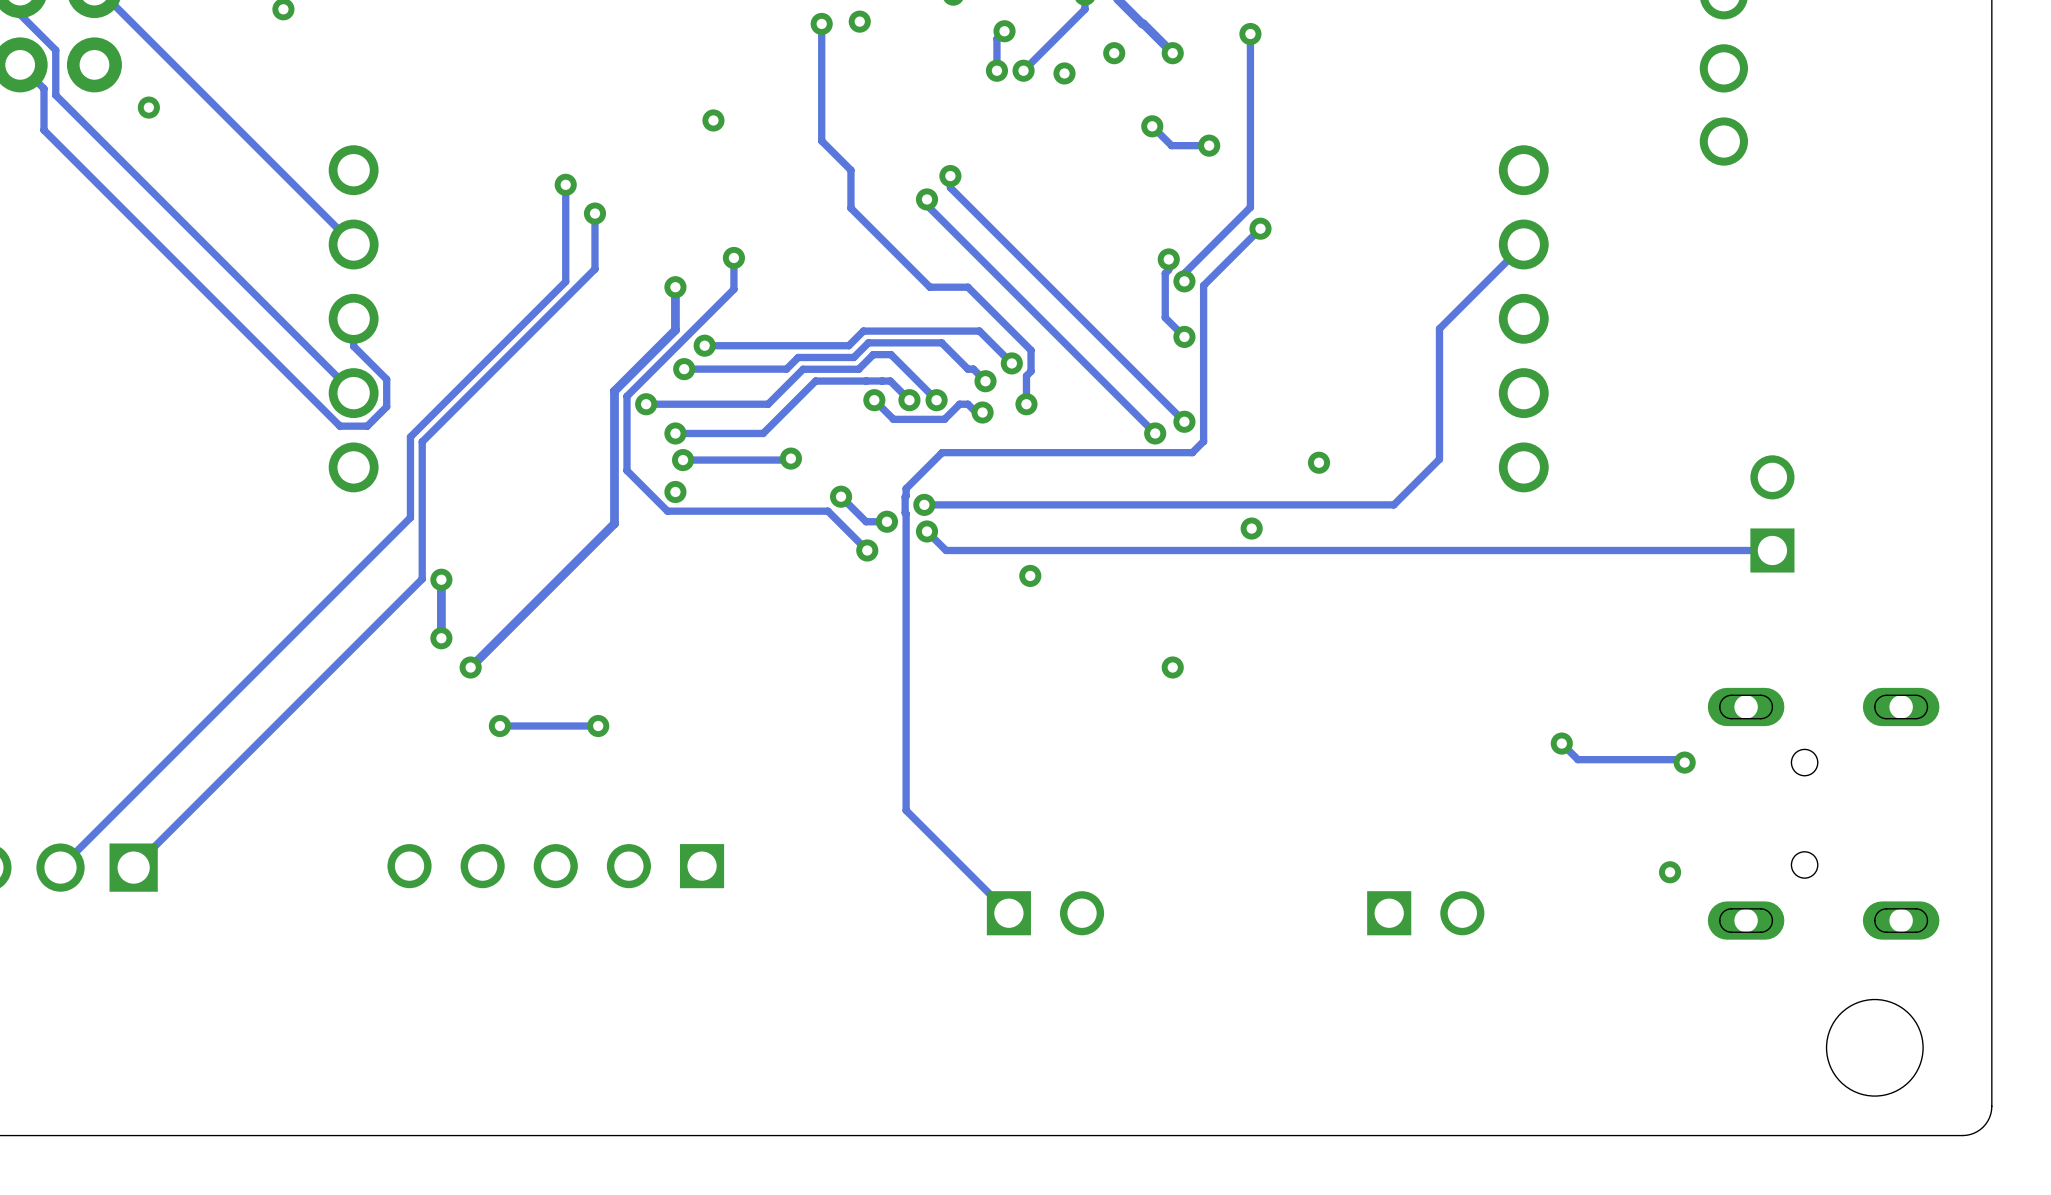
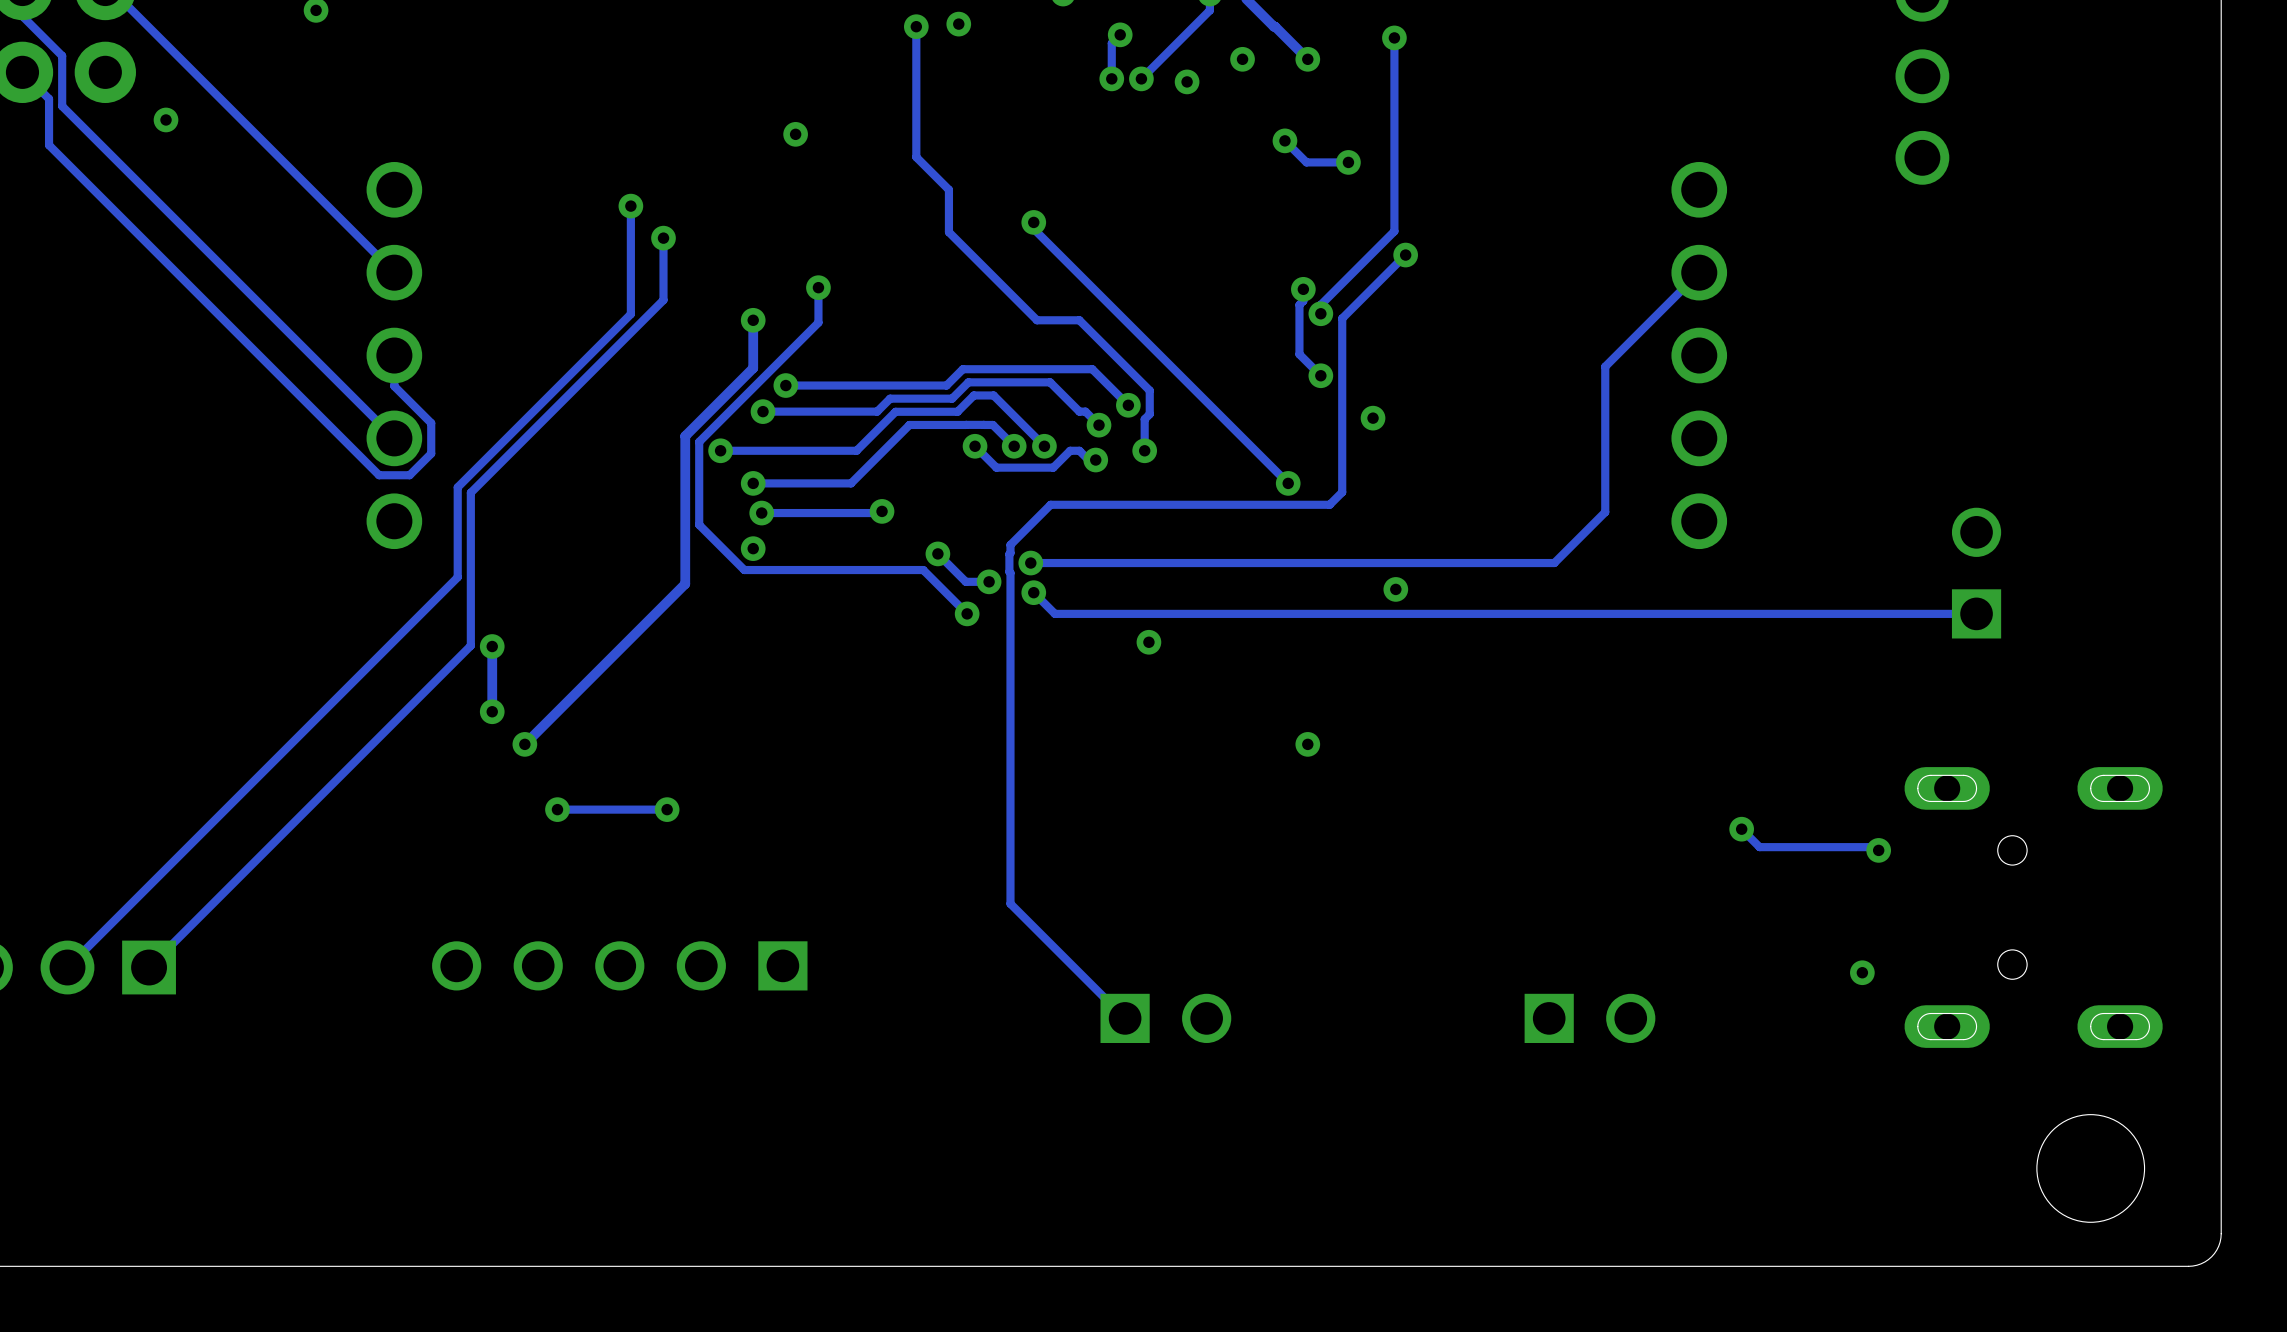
track: (950, 176) (950, 187) (1184, 421) -> none
via: (950, 176) -> none
via: none -> (1373, 418)
via: (1184, 421) -> none
via: (1319, 462) -> none

